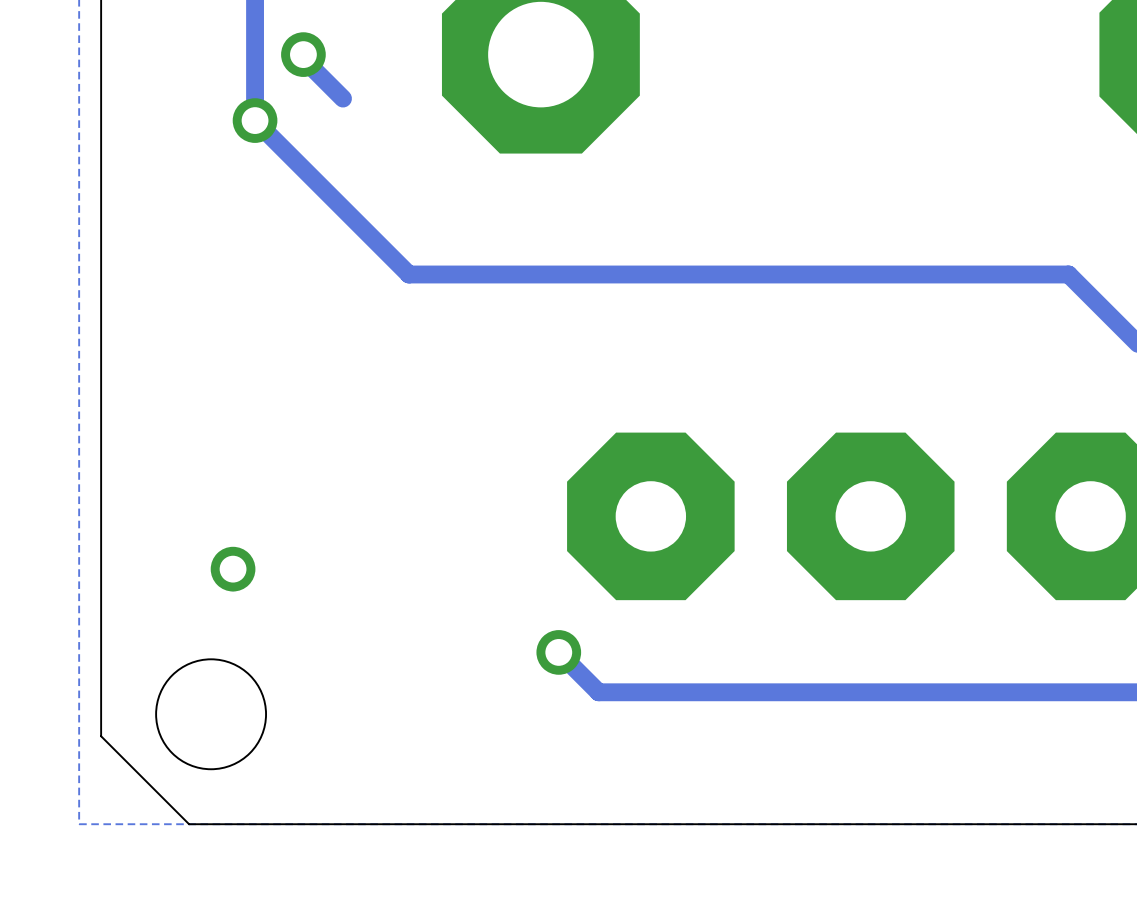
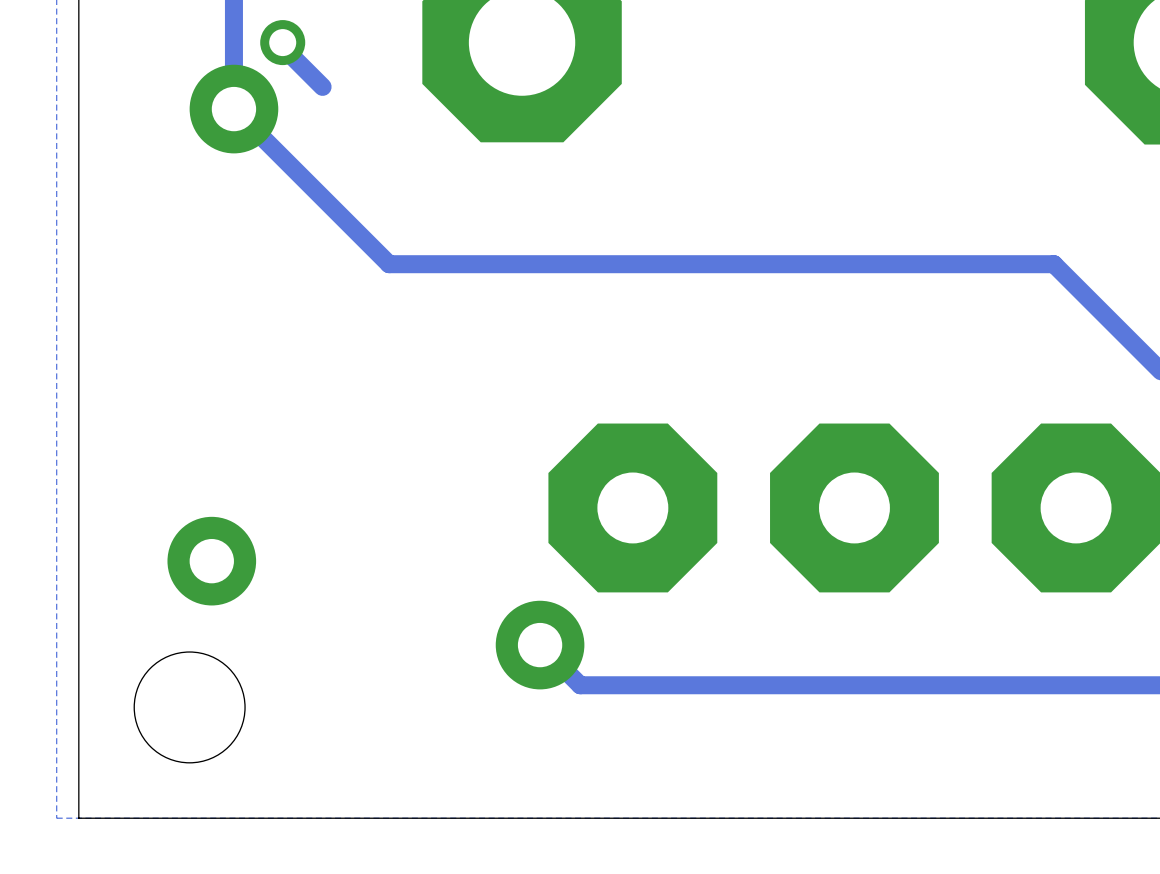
via size: [232, 98, 278, 143] -> [189, 64, 279, 154]
via size: [210, 546, 256, 592] -> [167, 516, 257, 606]
via size: [536, 630, 582, 675] -> [495, 600, 585, 690]
board edge: (101, 736) (189, 824) -> (78, 729) (78, 818) (167, 818)

